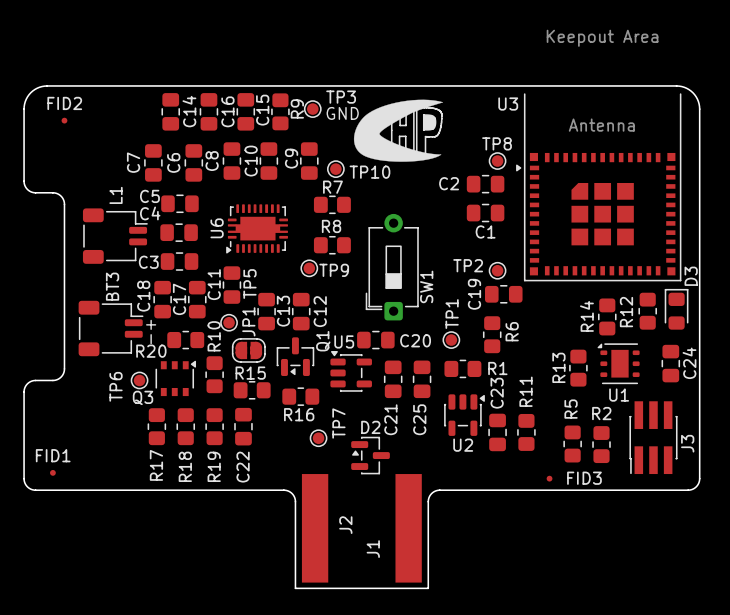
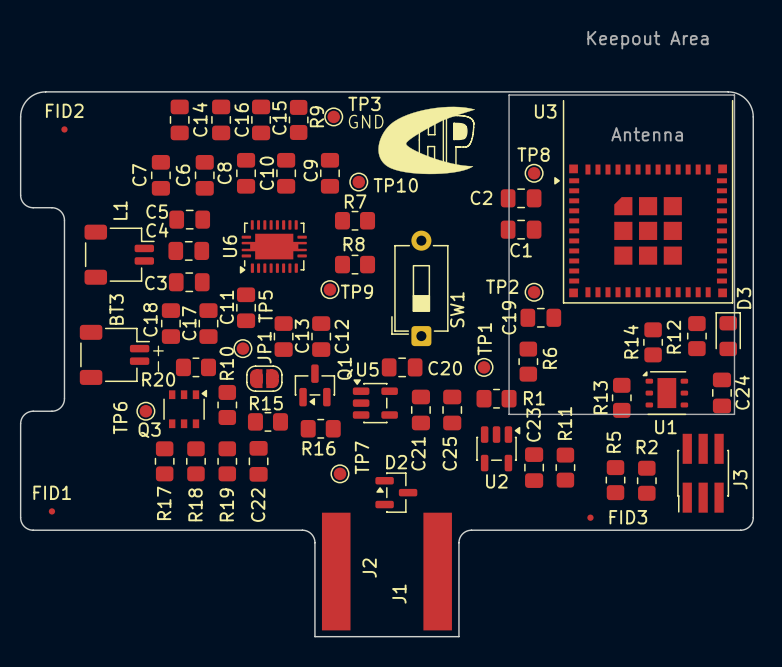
line: none -> (509, 95) (734, 95) (734, 414) (509, 414) (509, 95)

